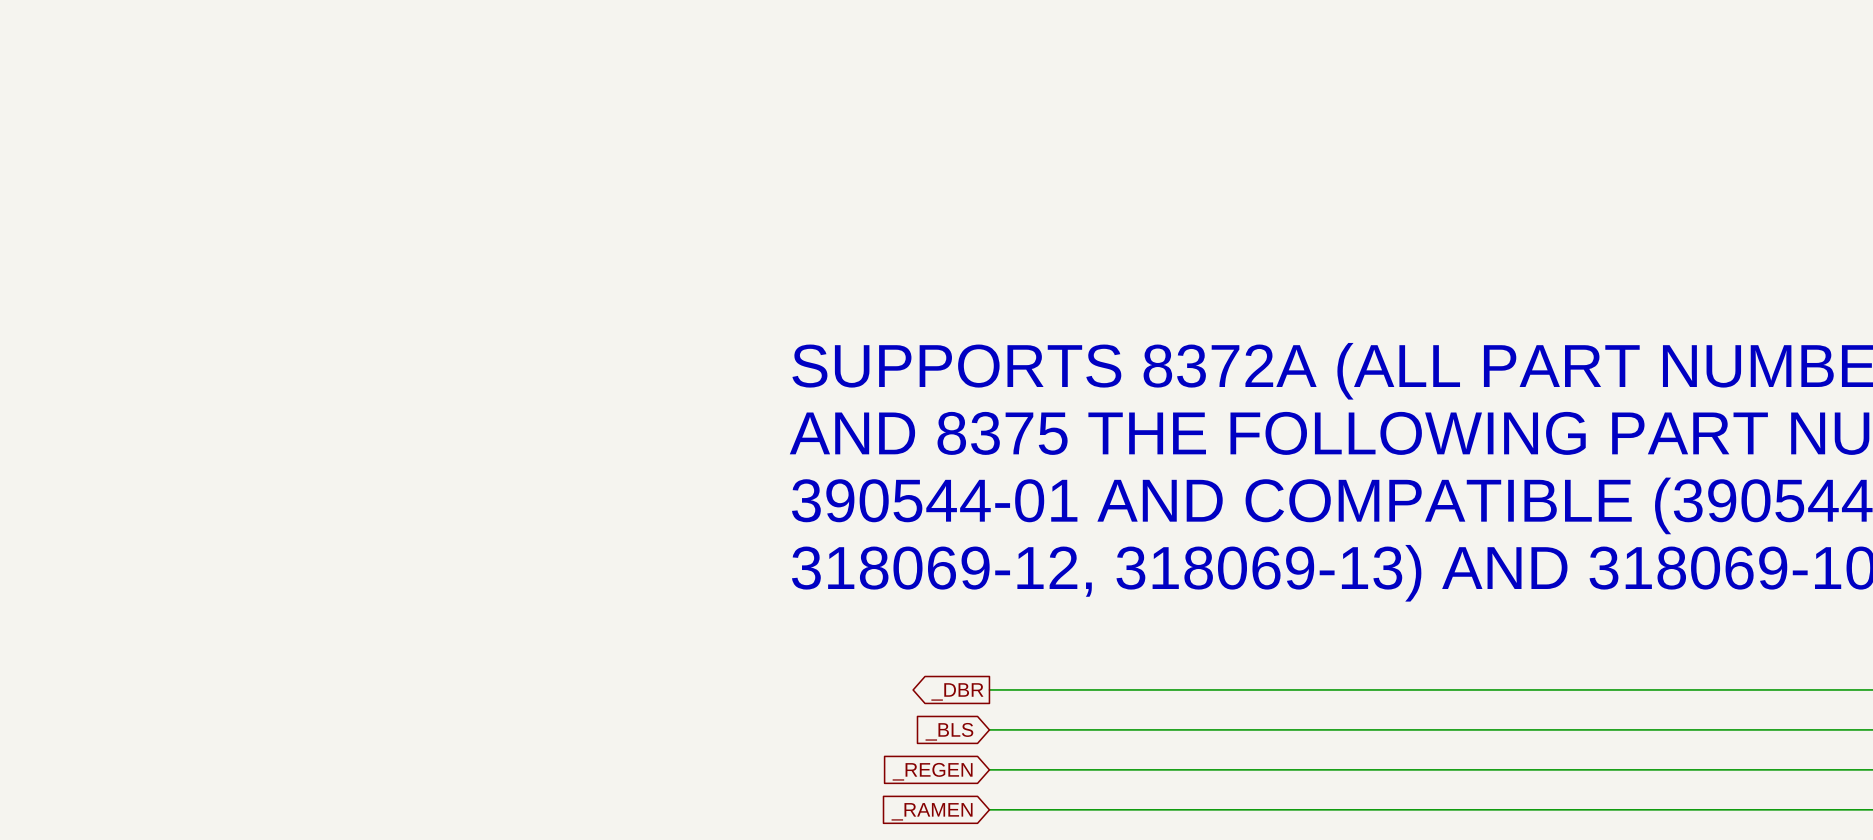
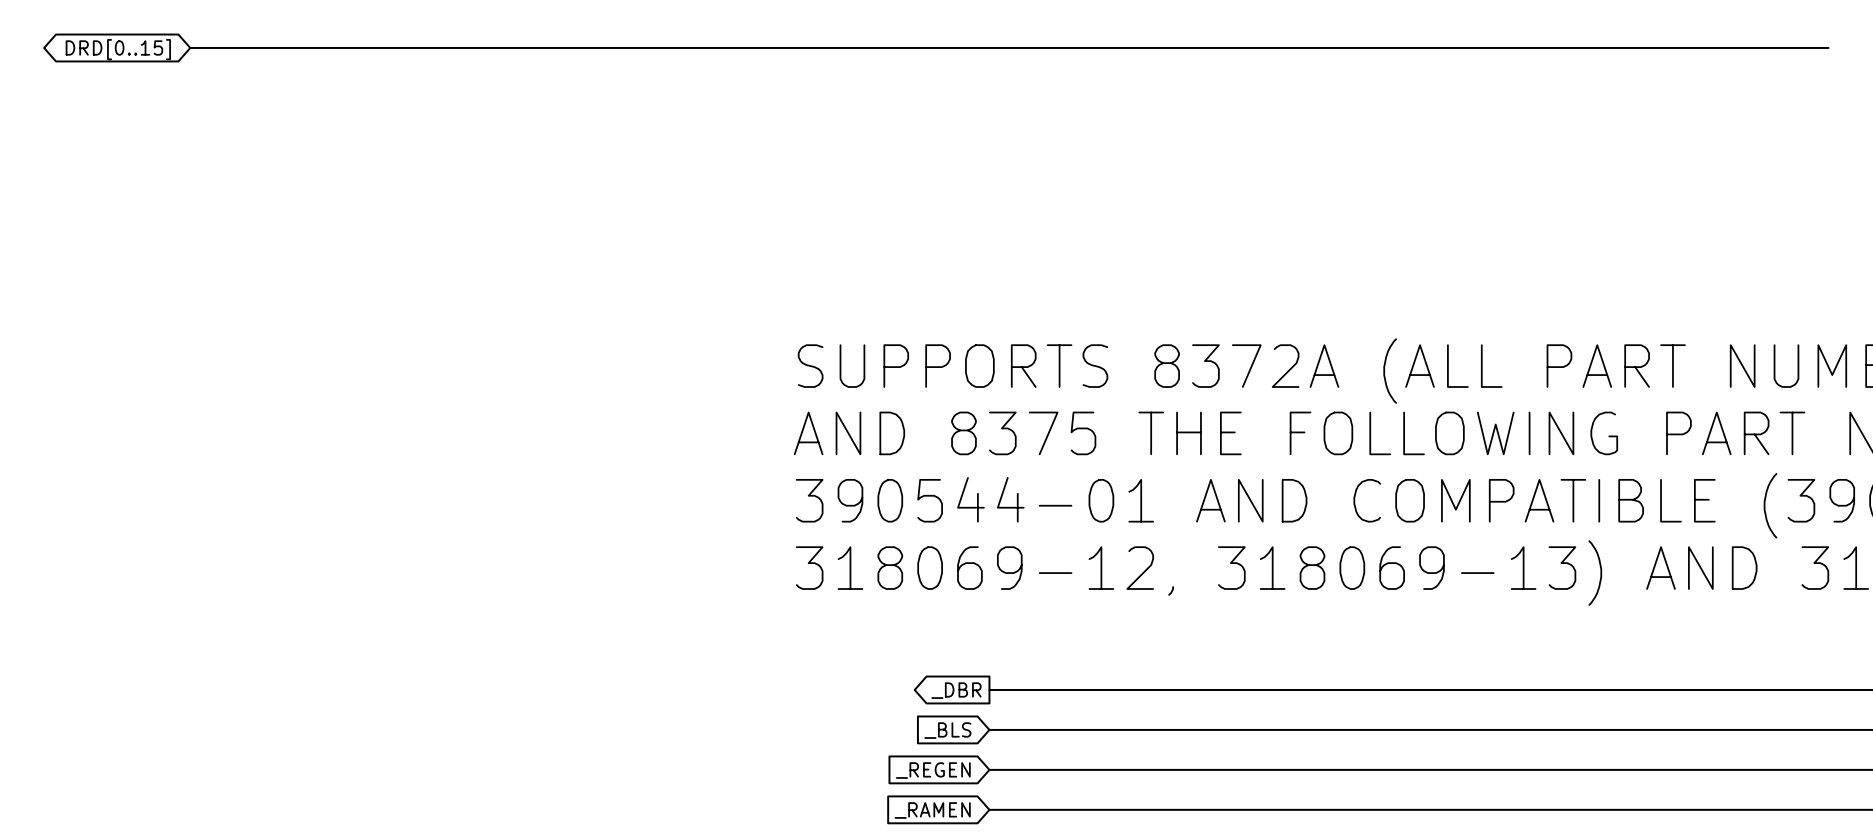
bus: none -> (190, 47) (1828, 47)
global label: none -> DRD[0..15] (118, 49)

